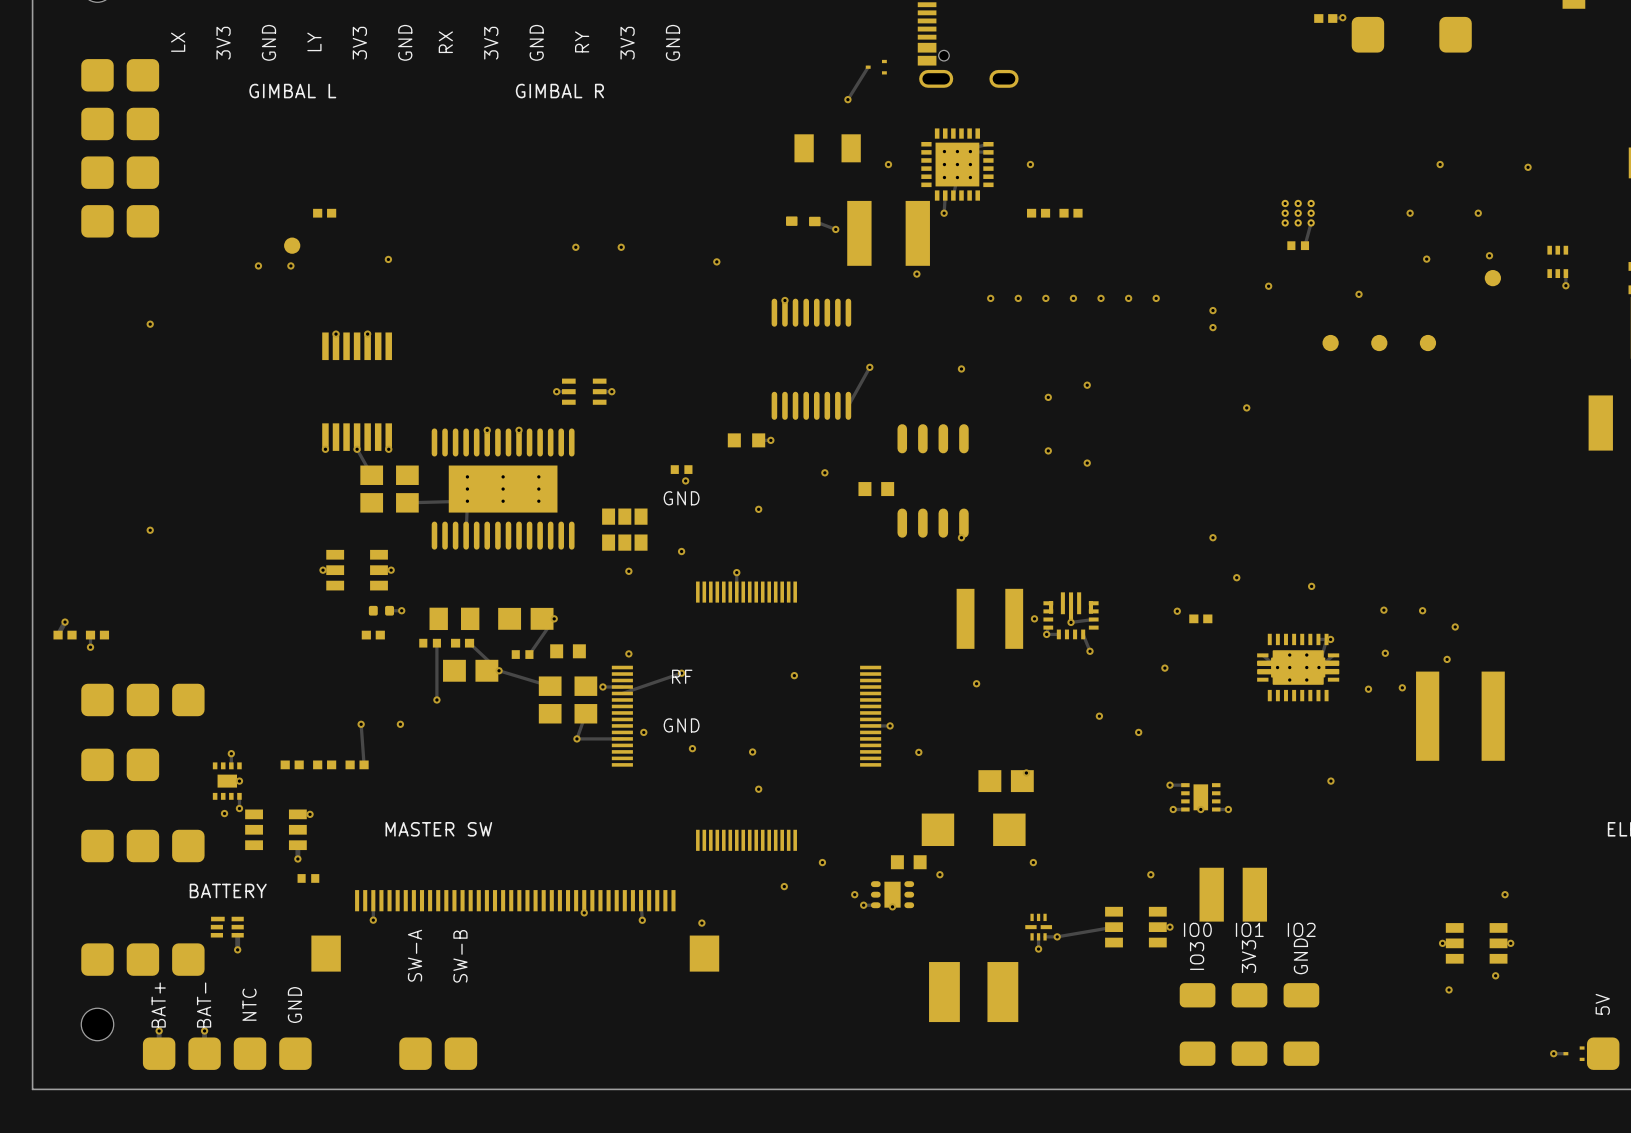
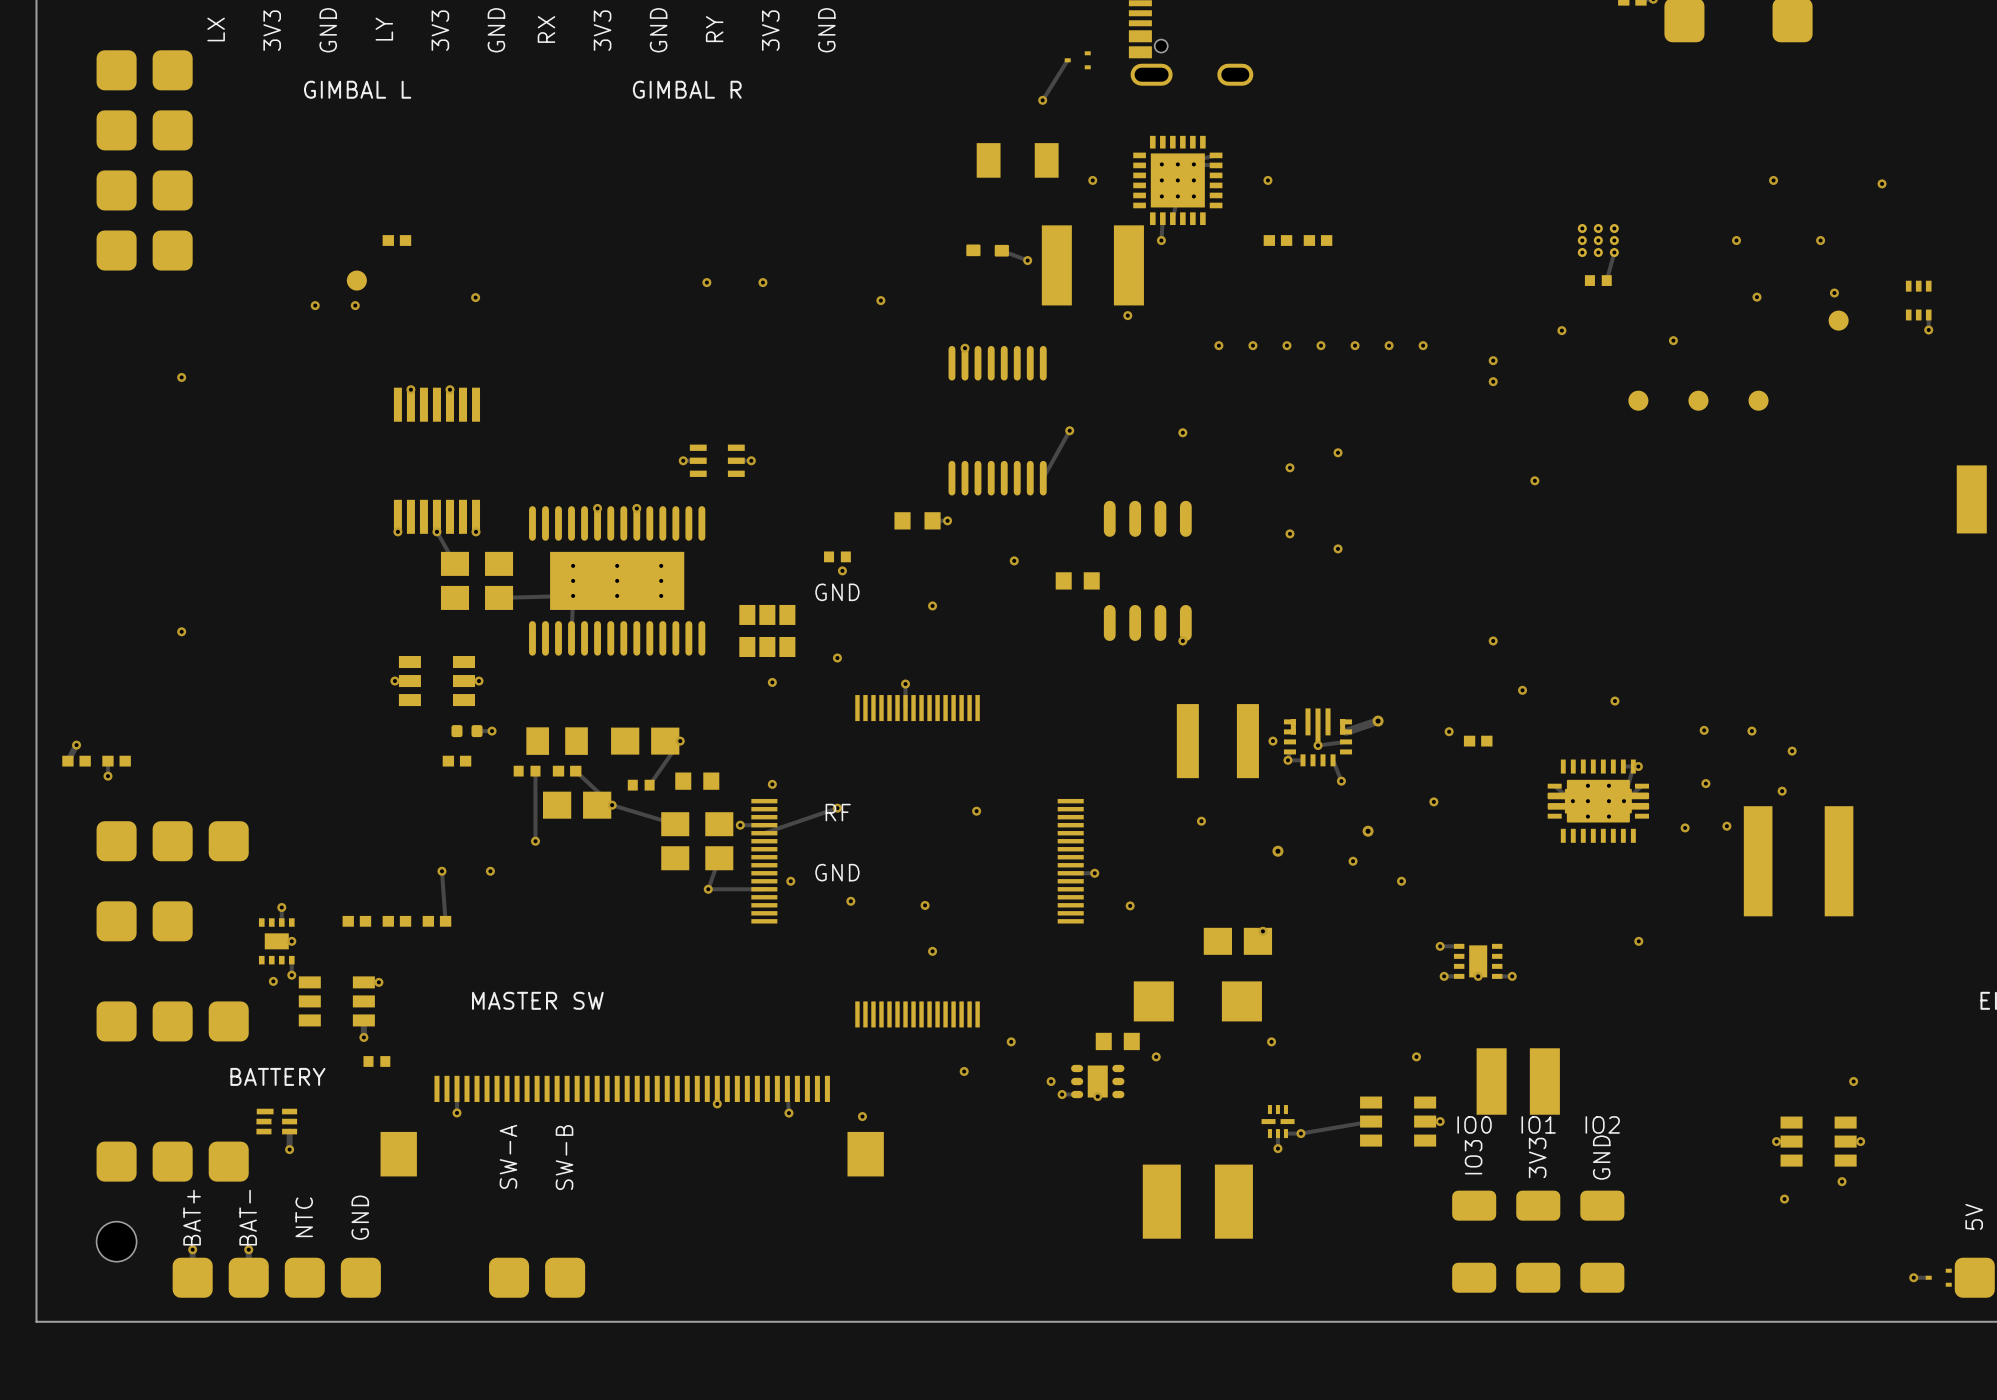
track: none -> (1378, 721) (1346, 731)
via: none -> (1378, 721)
via: none -> (1368, 831)
via: none -> (1277, 851)

